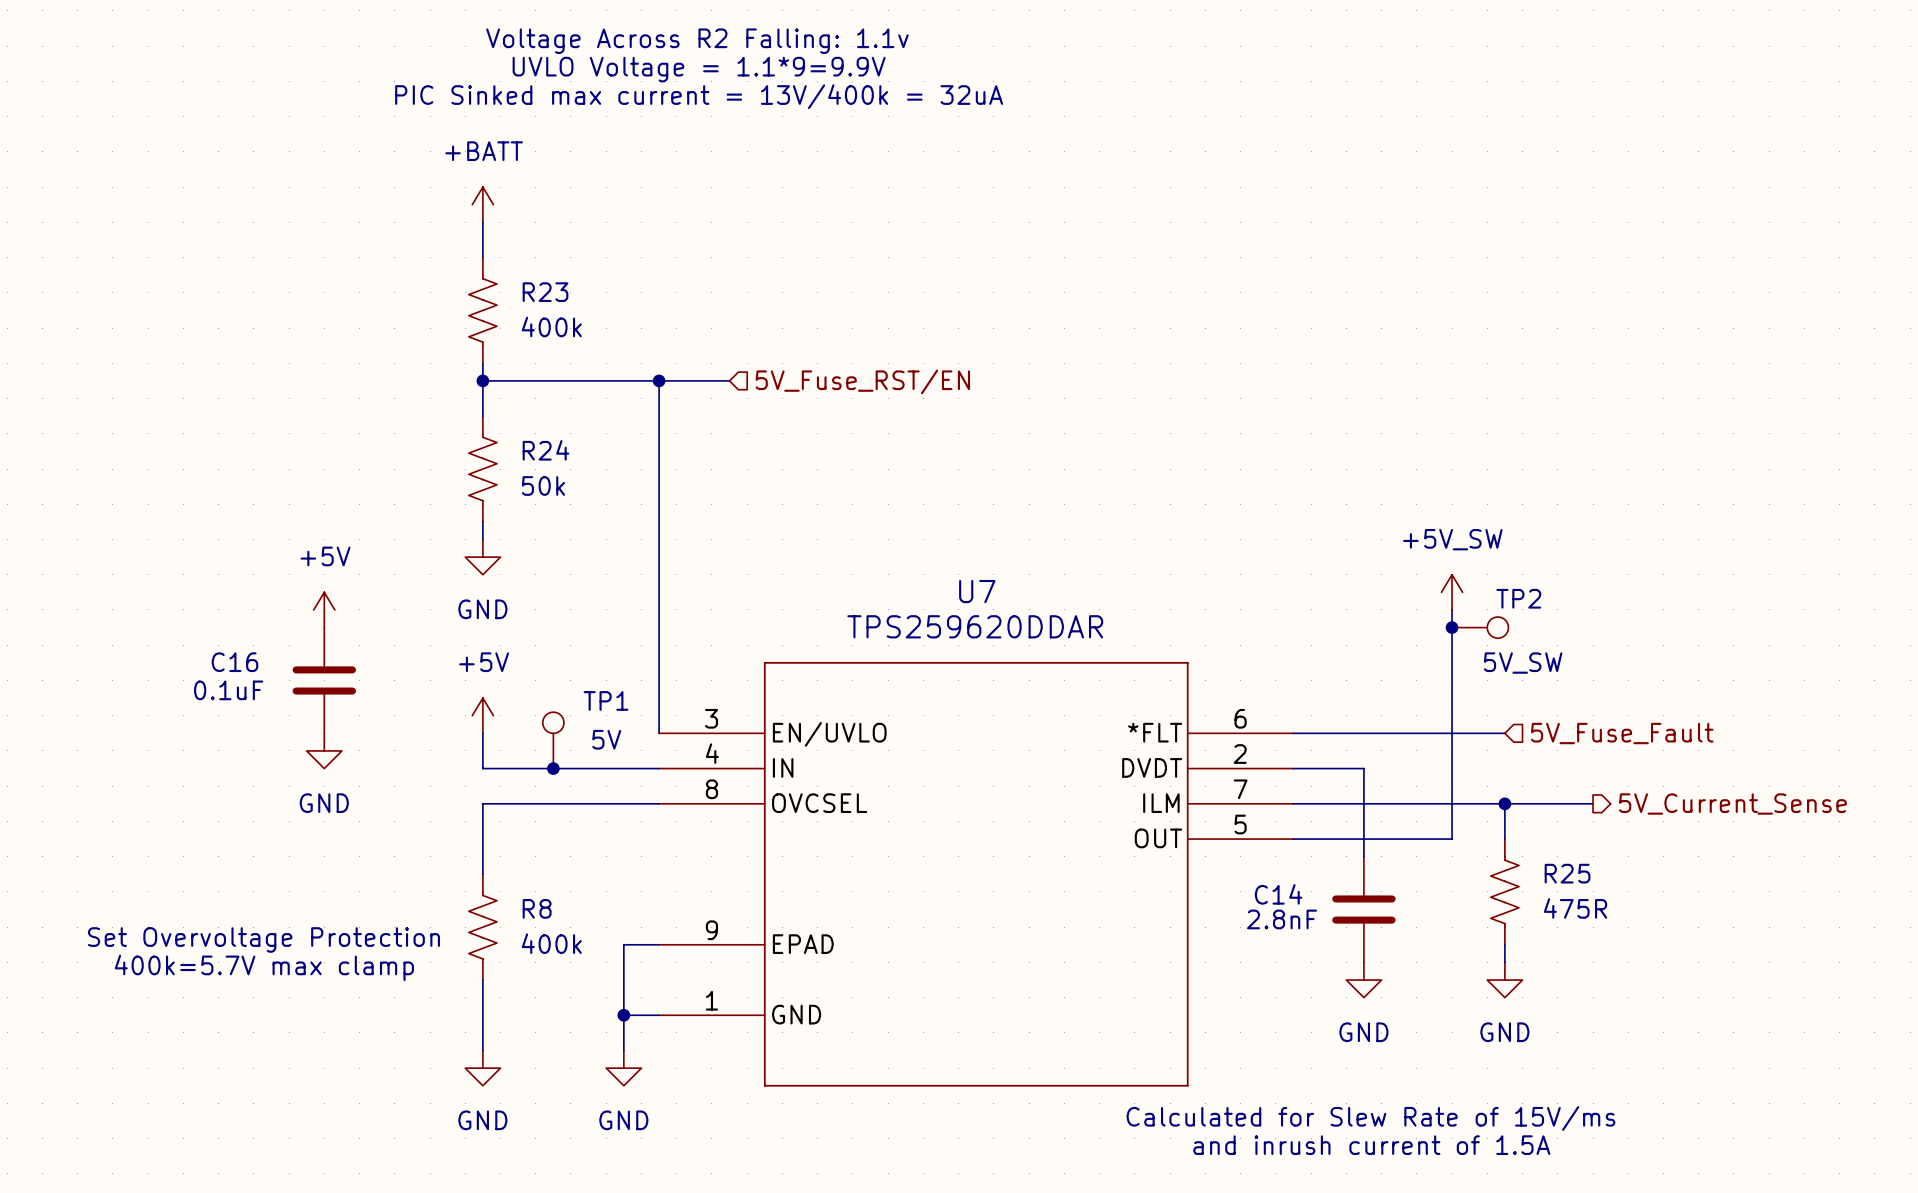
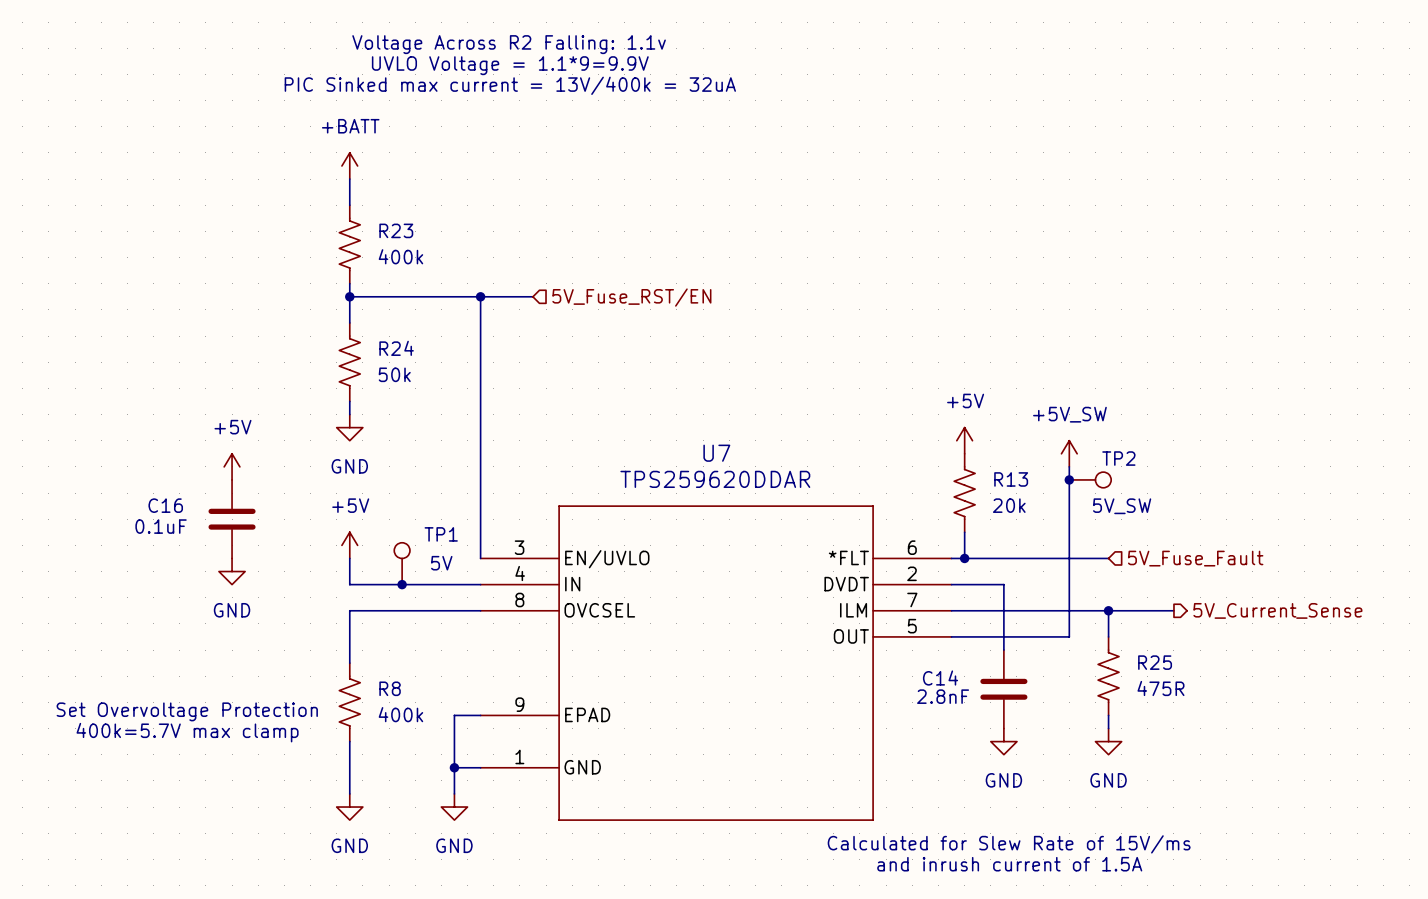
power symbol: none -> +5V (964, 440)
R13: none -> 20k (964, 493)
wire: none -> (964, 532) (964, 558)
junction: none -> (964, 558)

